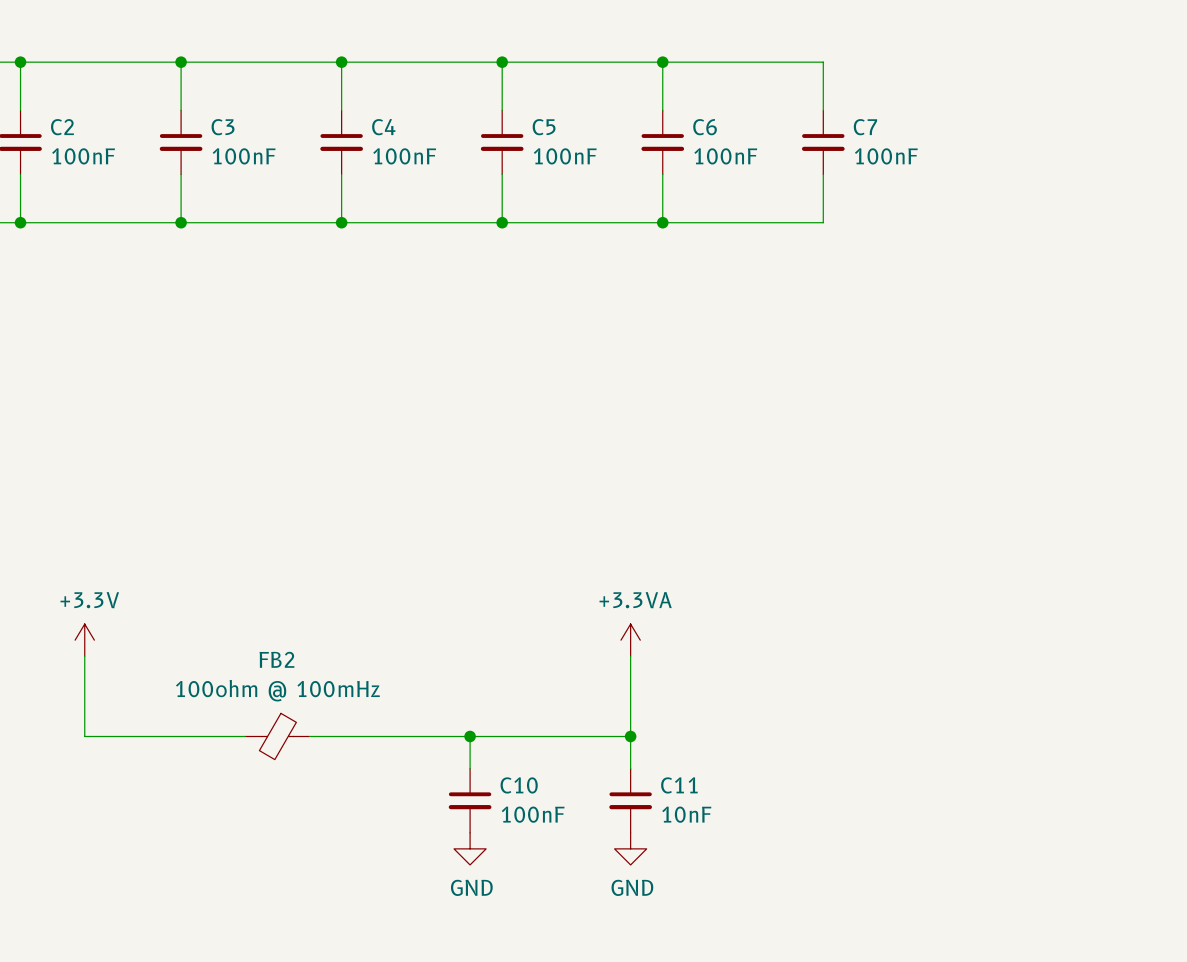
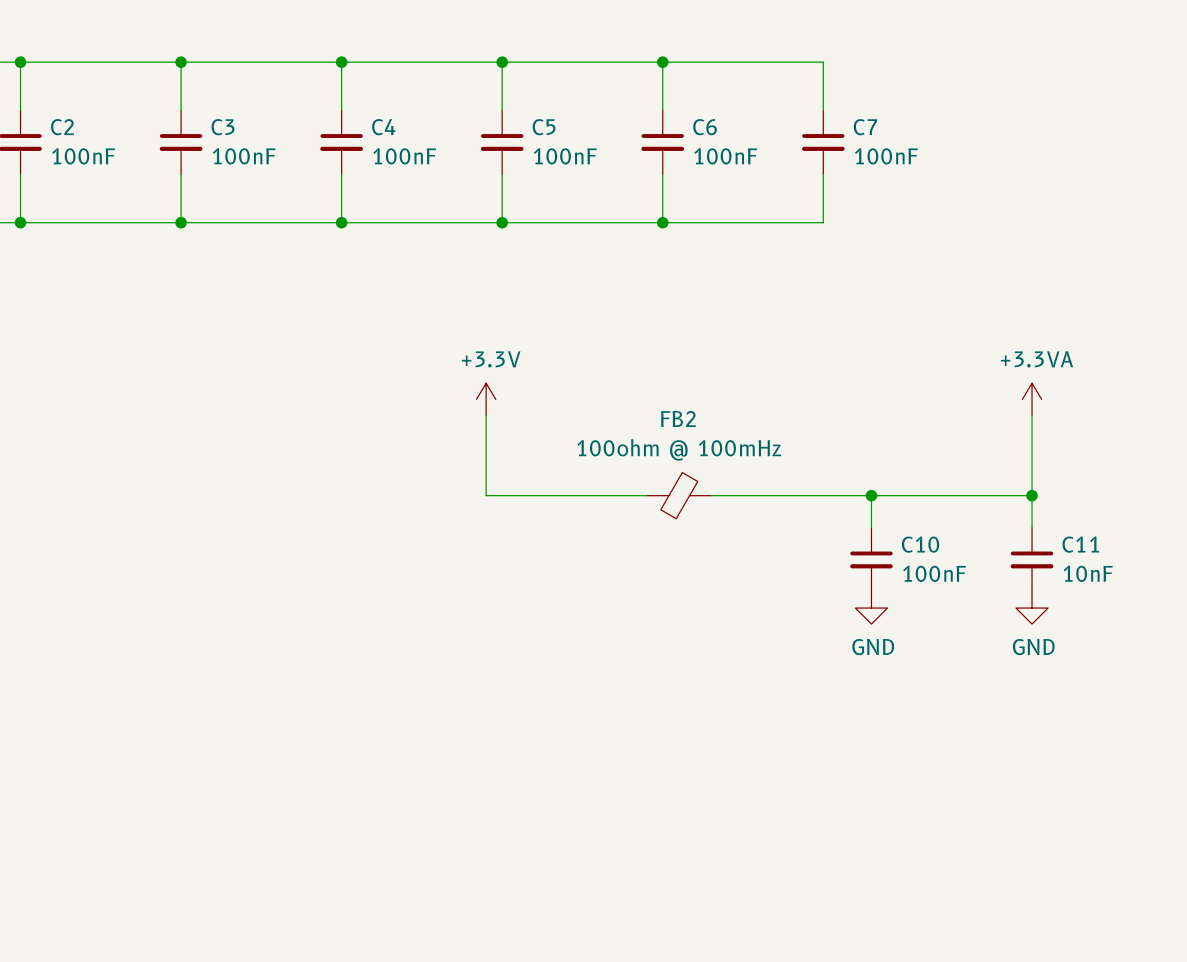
power symbol: none -> +3.3V (486, 399)
power symbol: none -> +3.3VA (1032, 399)
wire: none -> (486, 415) (486, 495) (646, 495)
wire: none -> (1032, 415) (1032, 527)
wire: none -> (710, 495) (1032, 495)
wire: none -> (871, 495) (871, 527)
junction: none -> (871, 495)
junction: none -> (1032, 495)
power symbol: none -> GND (871, 608)
power symbol: none -> GND (1032, 608)
power symbol: +3.3V (84, 640) -> none
power symbol: +3.3VA (630, 640) -> none
wire: (84, 656) (84, 736) (245, 736) -> none
wire: (630, 656) (630, 768) -> none
FB2 position: (277, 736) -> (678, 495)
wire: (309, 736) (630, 736) -> none
wire: (470, 736) (470, 768) -> none
junction: (470, 736) -> none
junction: (630, 736) -> none
C10 position: (470, 800) -> (871, 559)
C11 position: (630, 800) -> (1032, 559)
power symbol: GND (470, 848) -> none
power symbol: GND (630, 848) -> none

